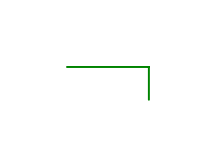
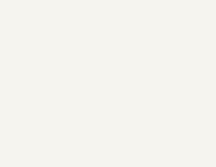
wire: (66, 66) (148, 66) (148, 99) -> none

